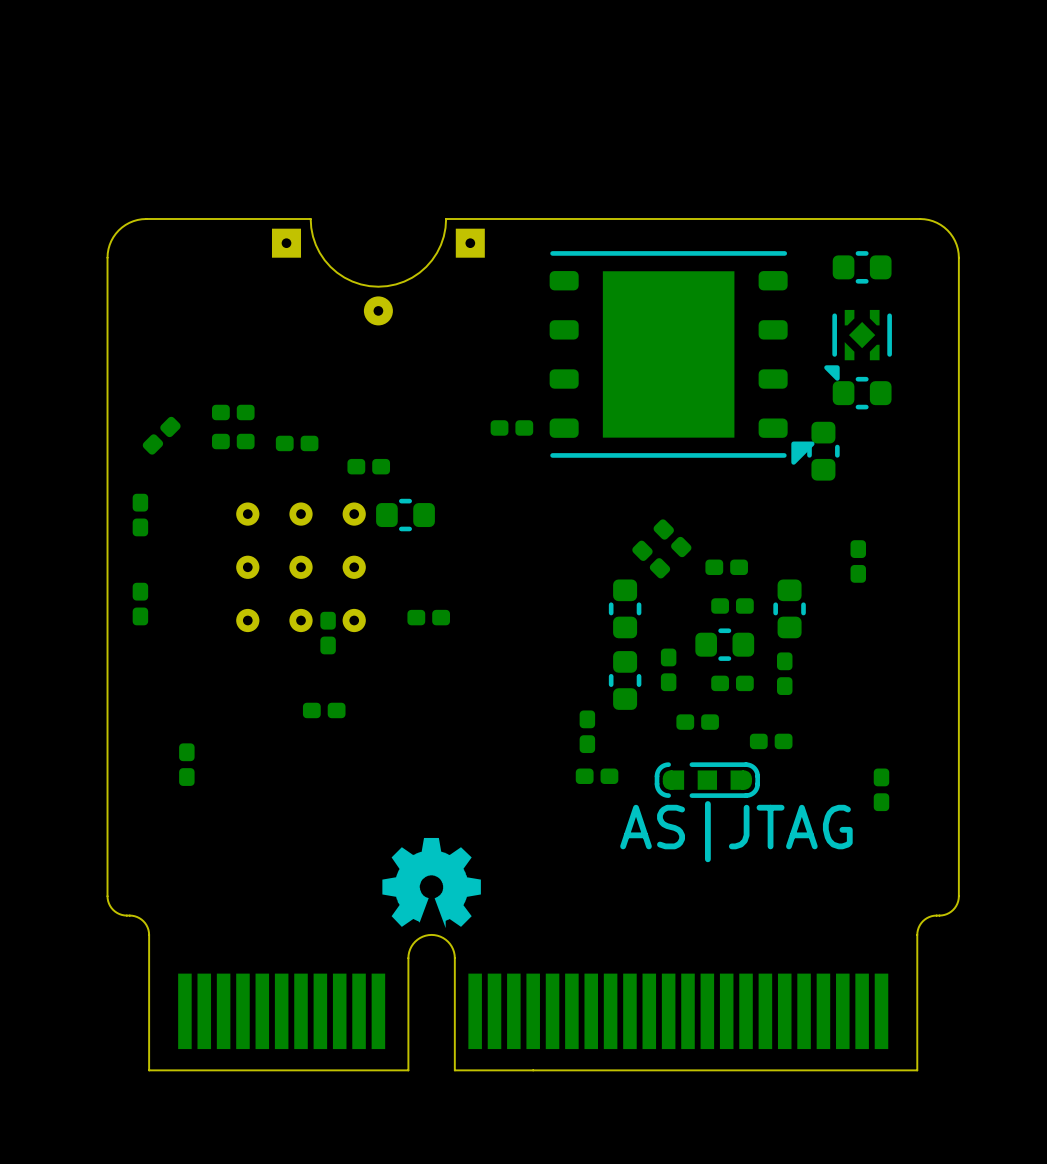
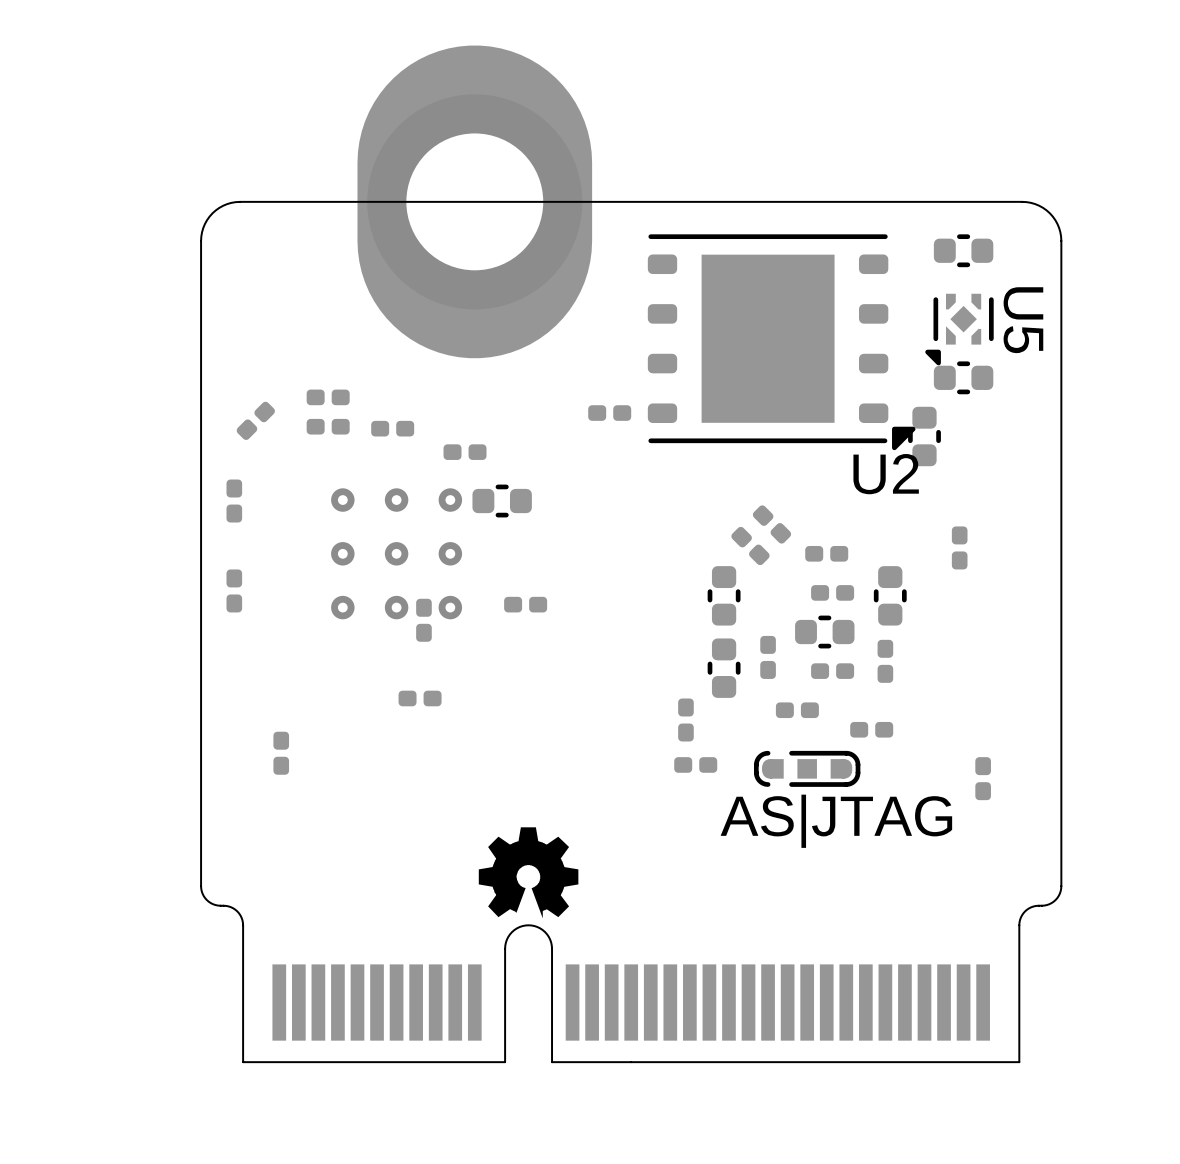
U5 name: none -> U5 (1023, 320)
U2 name: none -> U2 (886, 474)
part: none -> (631, 554)
part: (533, 644) -> none

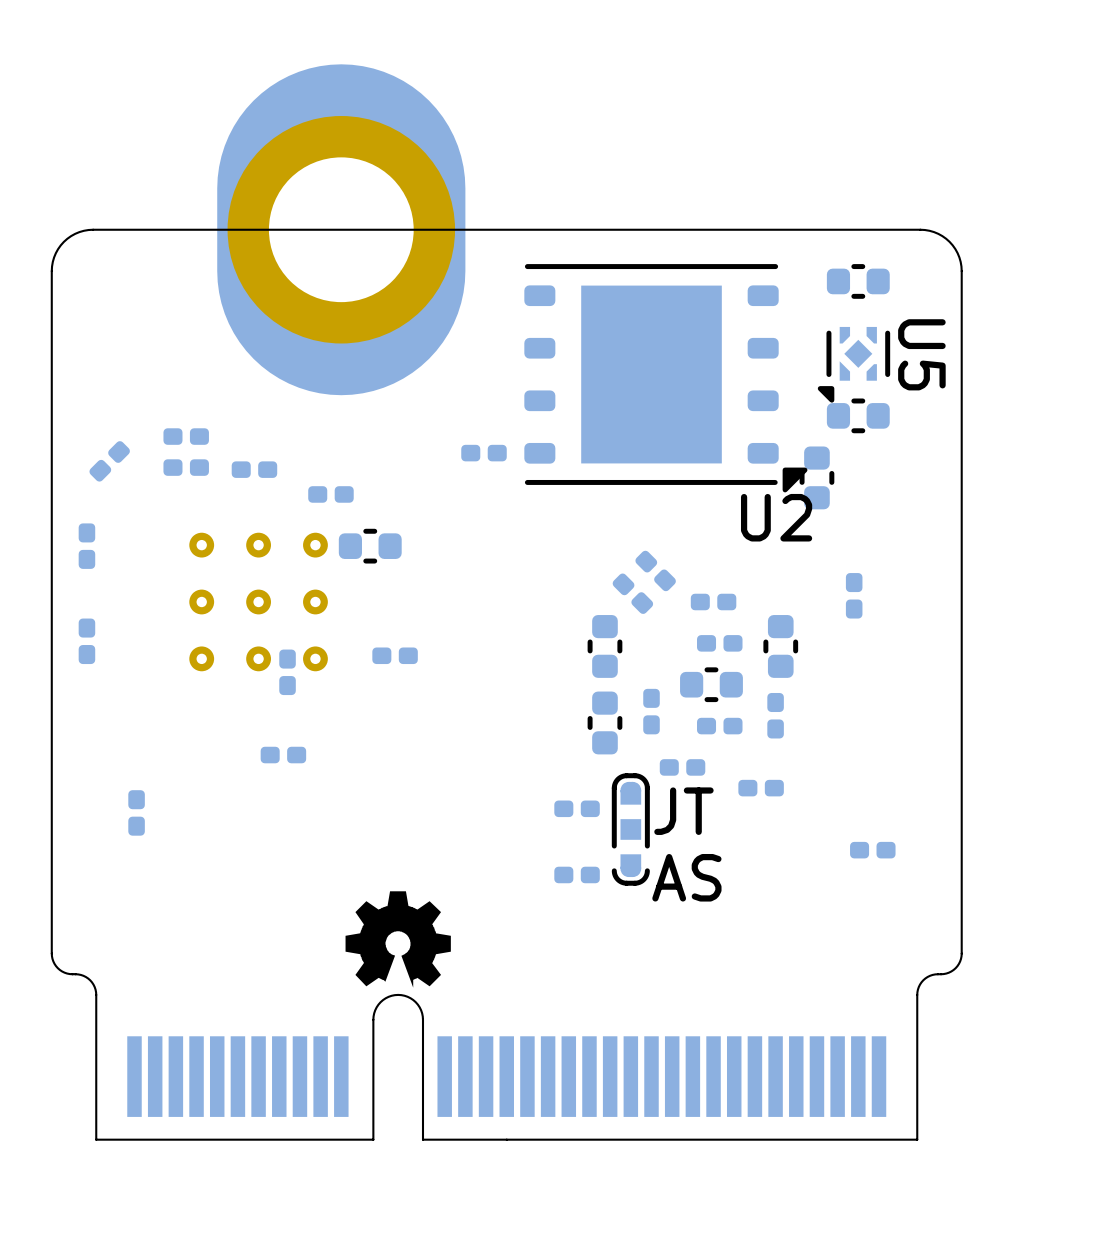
part: (685, 719) -> none
part: none -> (577, 808)
text: none -> JT (683, 811)
part: (695, 764) -> none
part rotation: 0° (807, 768) -> 90° counterclockwise (630, 829)
part rotation: 0° (983, 778) -> 90° clockwise (872, 850)
part: none -> (577, 874)
text: none -> AS (686, 877)
text: AS|JTAG (836, 821) -> none

